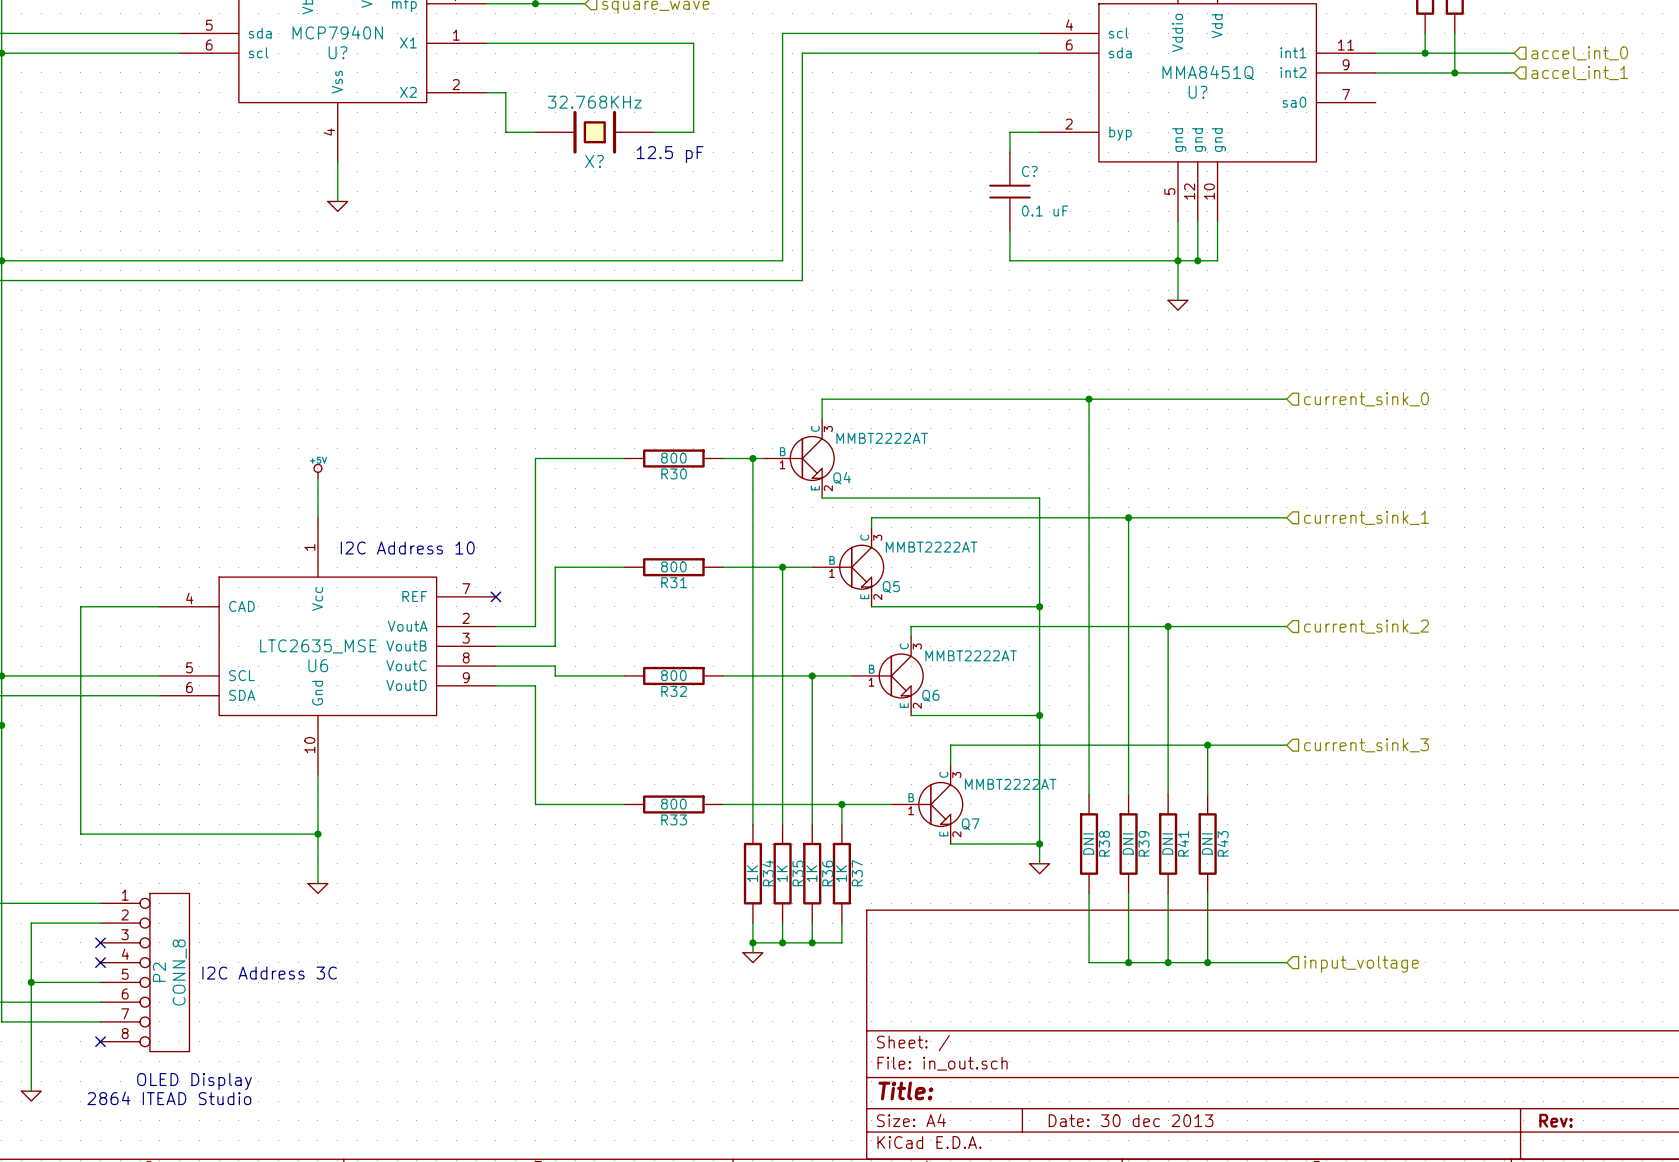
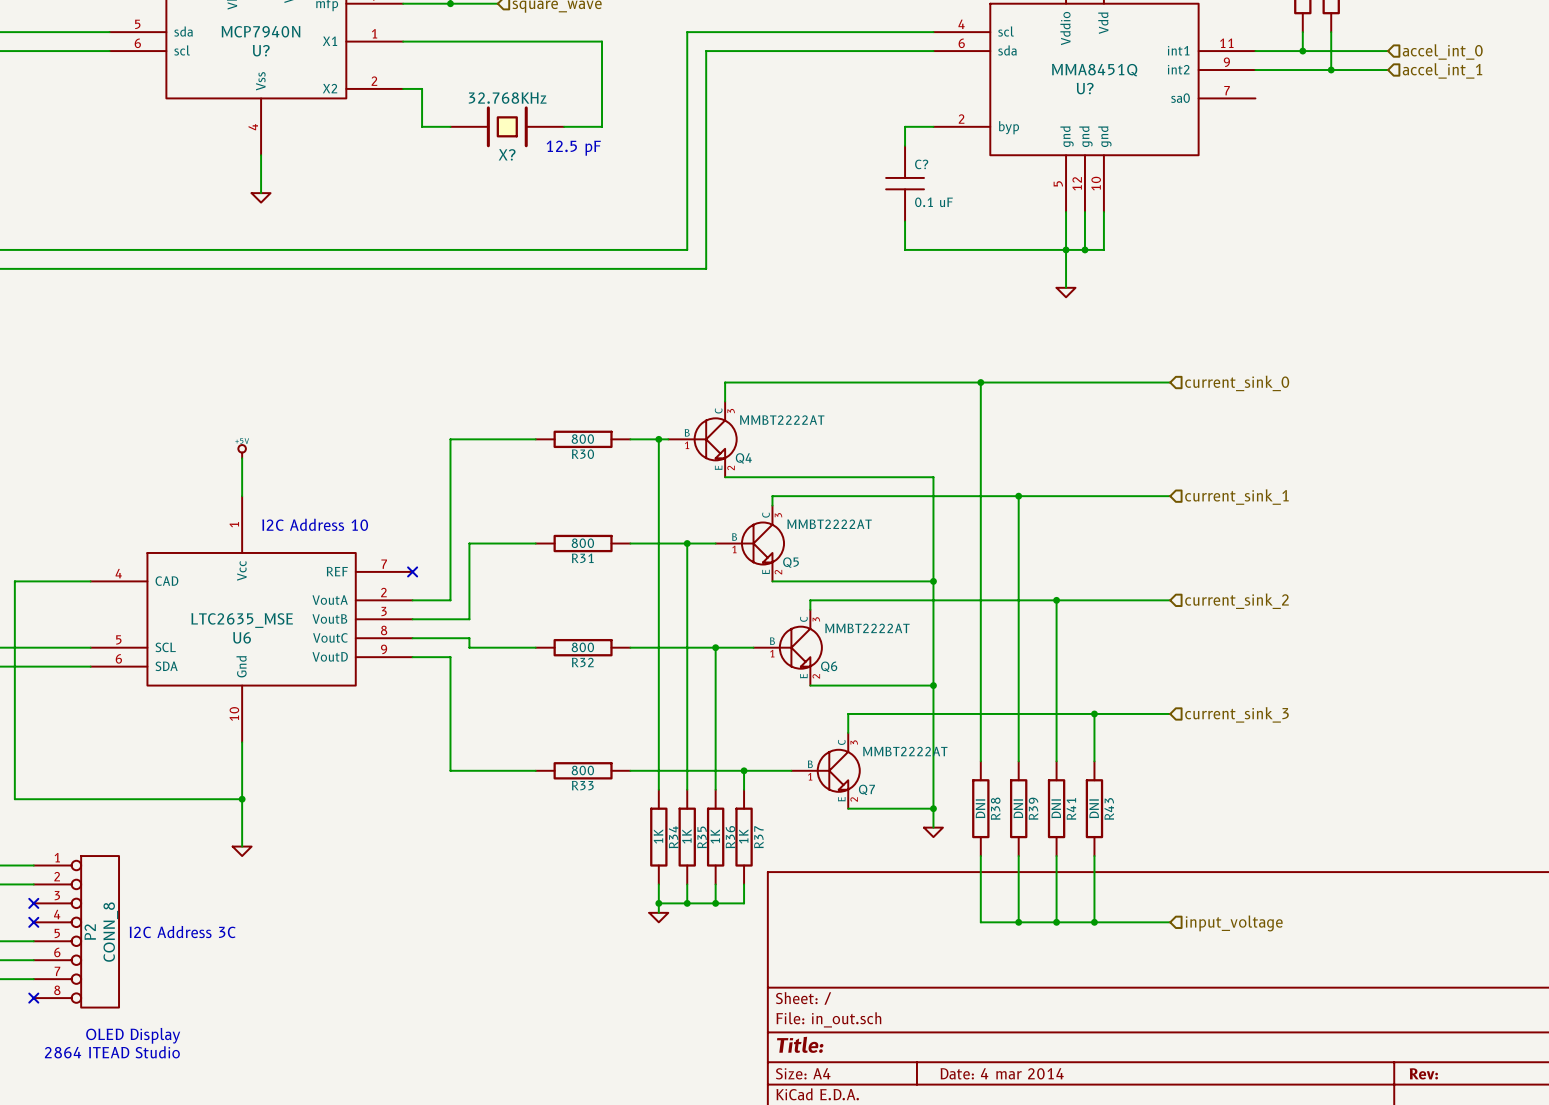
title block: Date: 30 dec 2013 (1131, 1120) -> Date: 4 mar 2014 (1002, 1073)

